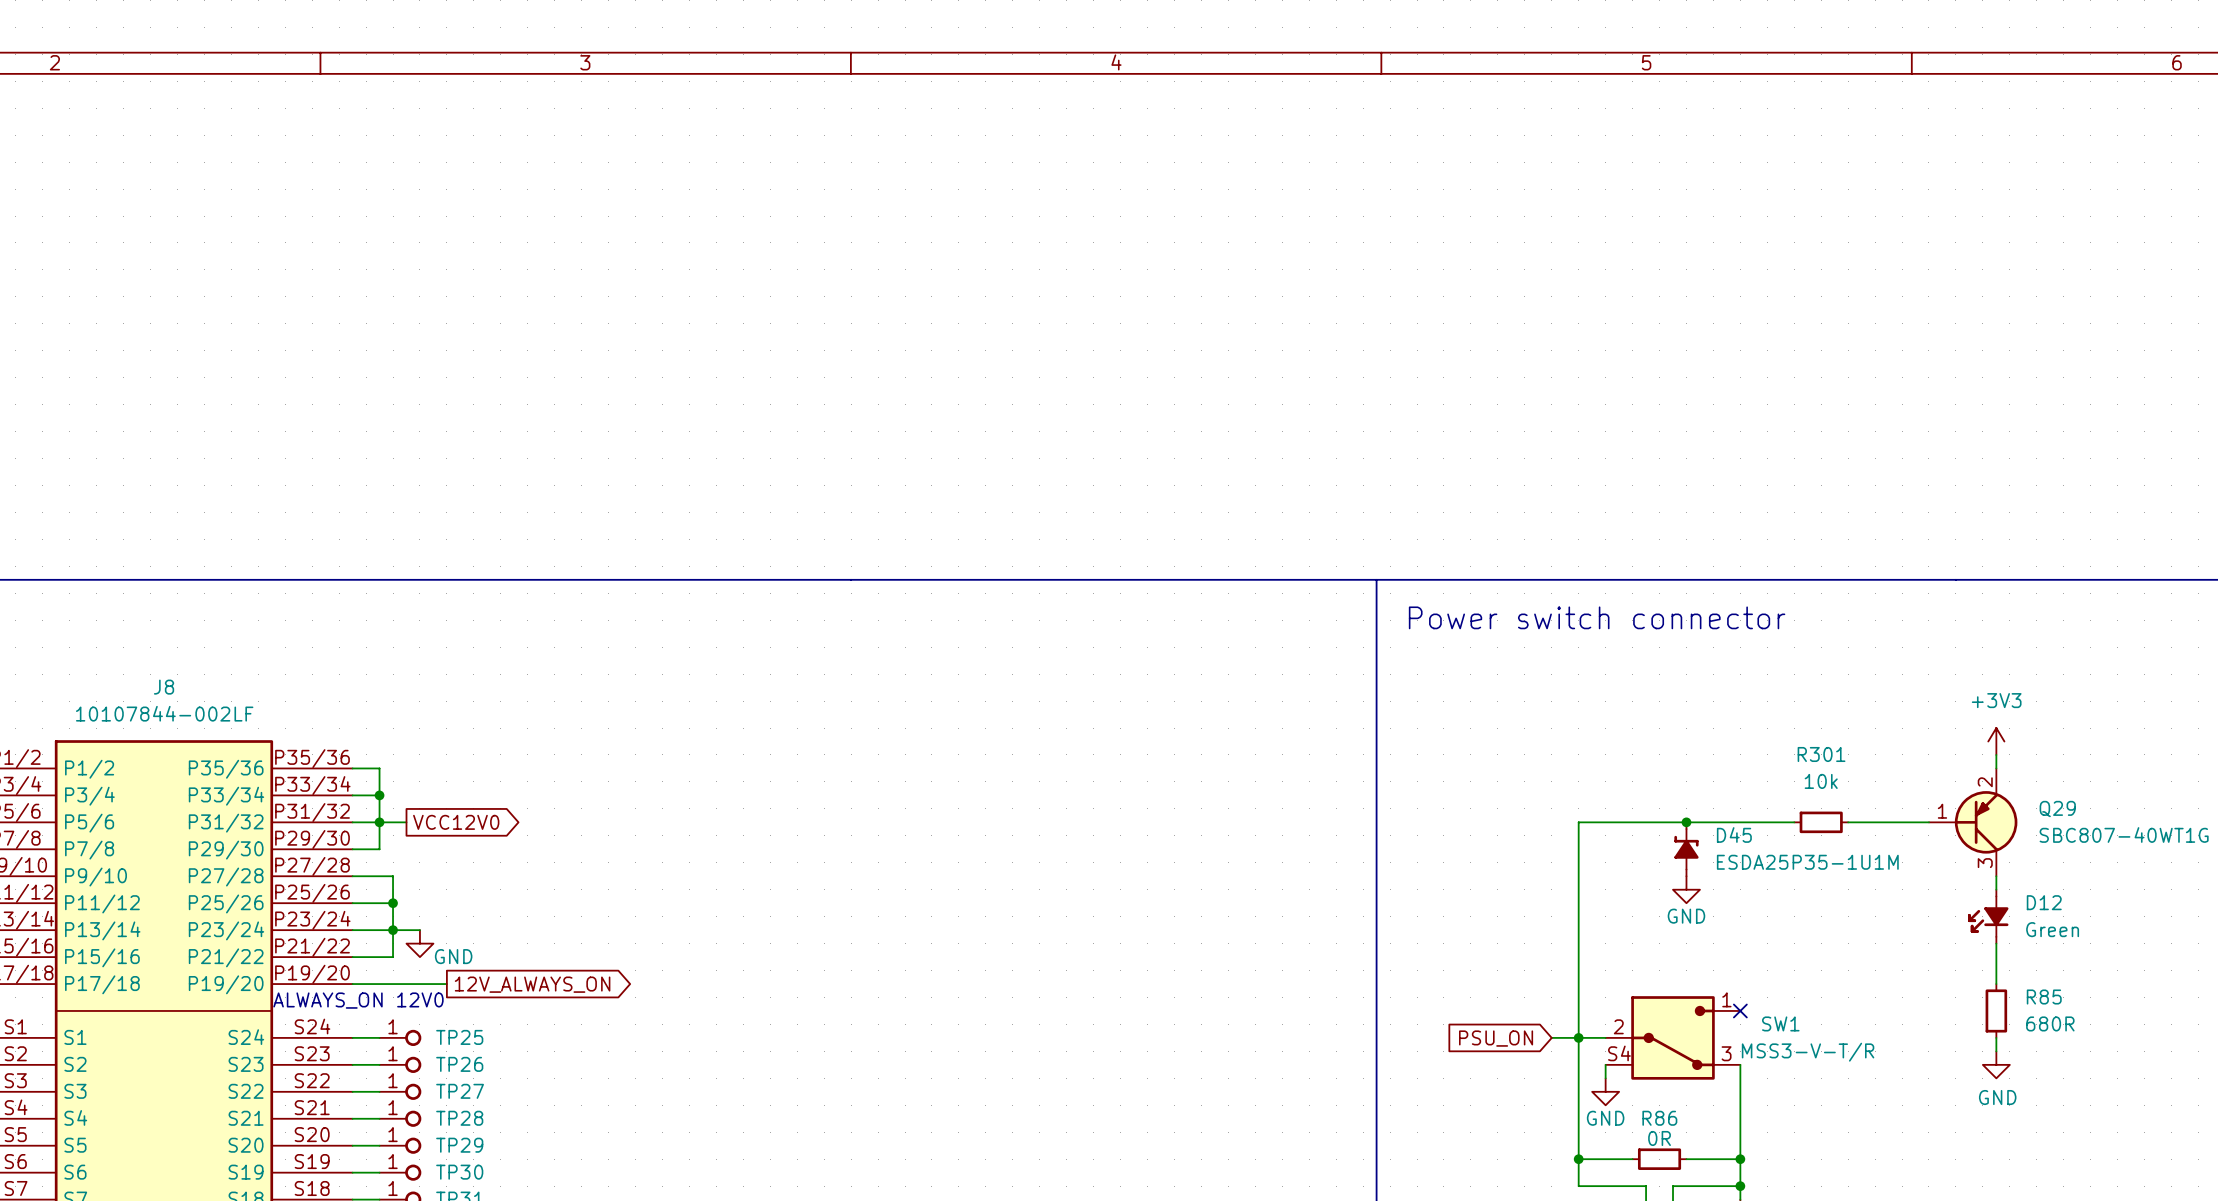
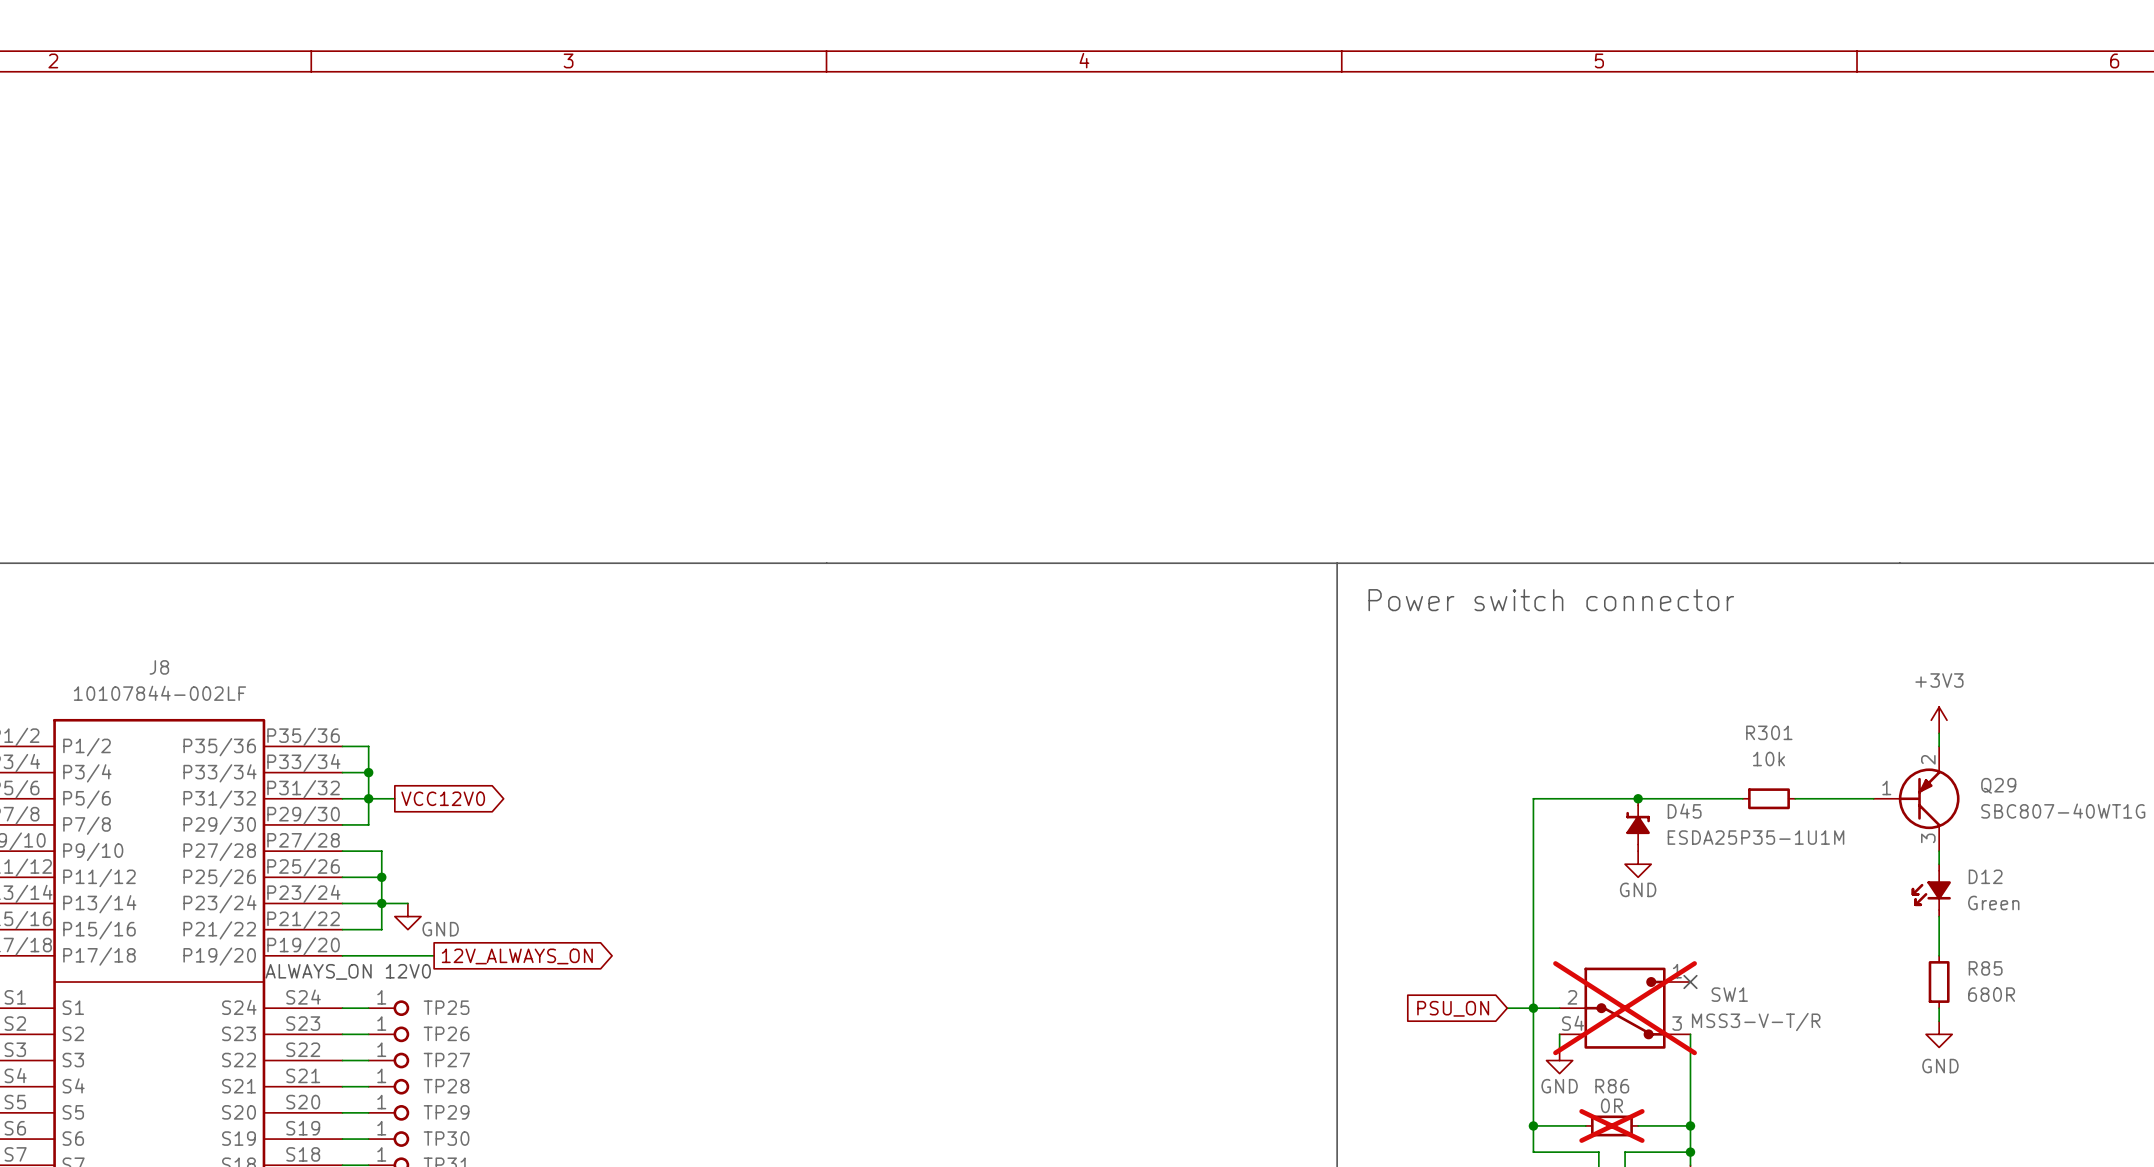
SW1 do-not-place cross: none -> (1625, 1008)
R86 do-not-place cross: none -> (1611, 1125)

